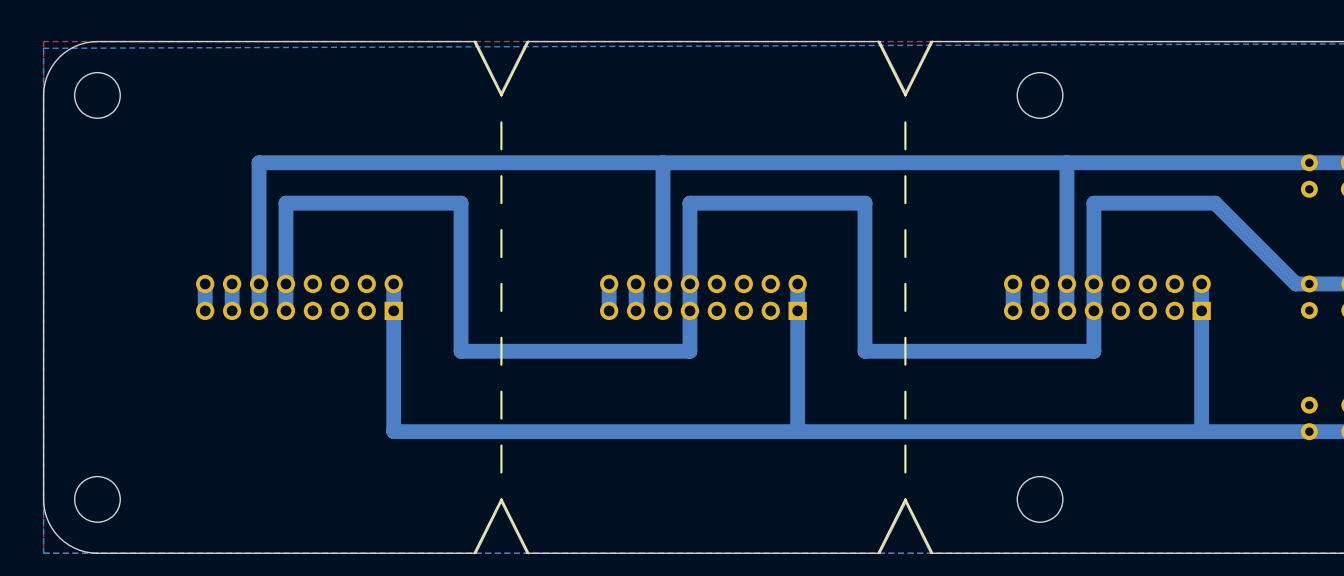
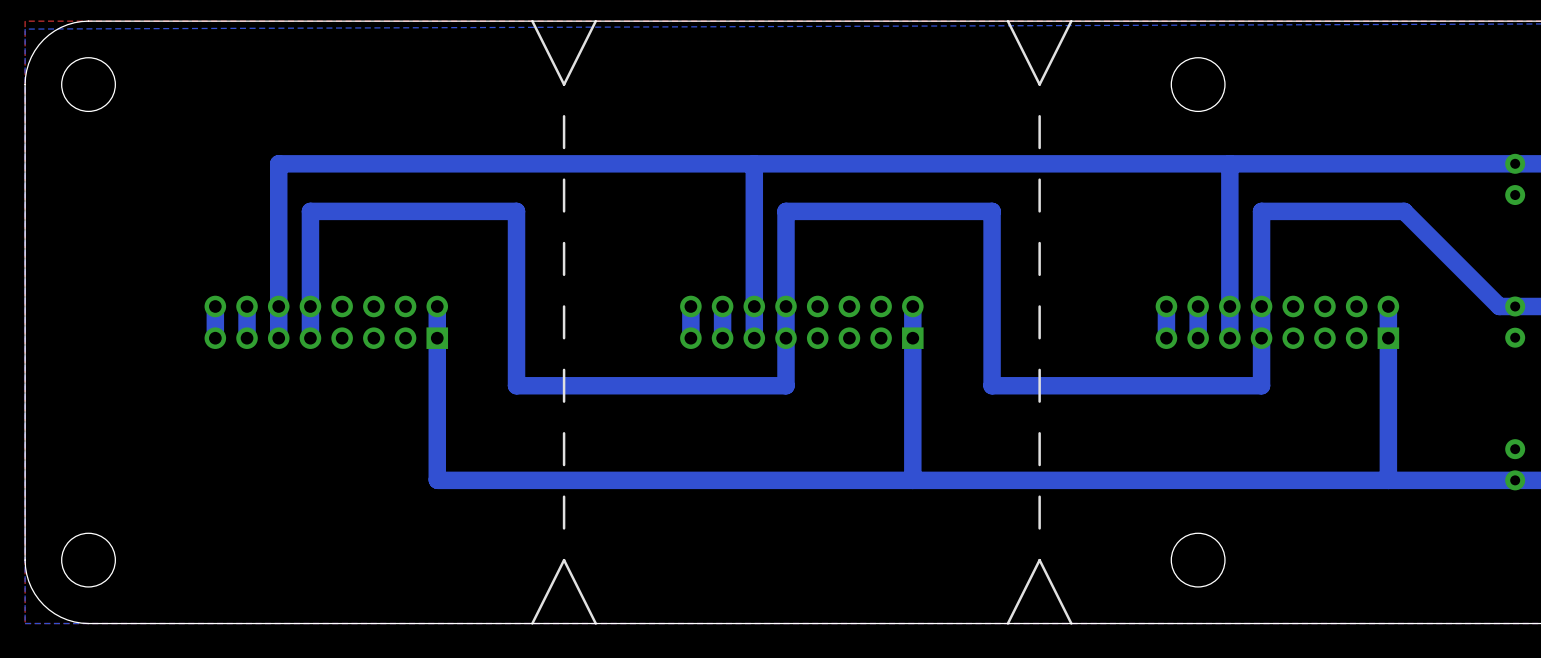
board edge: (526, 41) (501, 92) (475, 41) -> (594, 21) (534, 21)
board edge: (930, 41) (905, 92) (879, 41) -> (1069, 21) (1009, 21)
board edge: (526, 553) (501, 501) (475, 553) -> (594, 623) (534, 623)
board edge: (930, 553) (905, 502) (879, 553) -> (1069, 623) (1009, 623)

